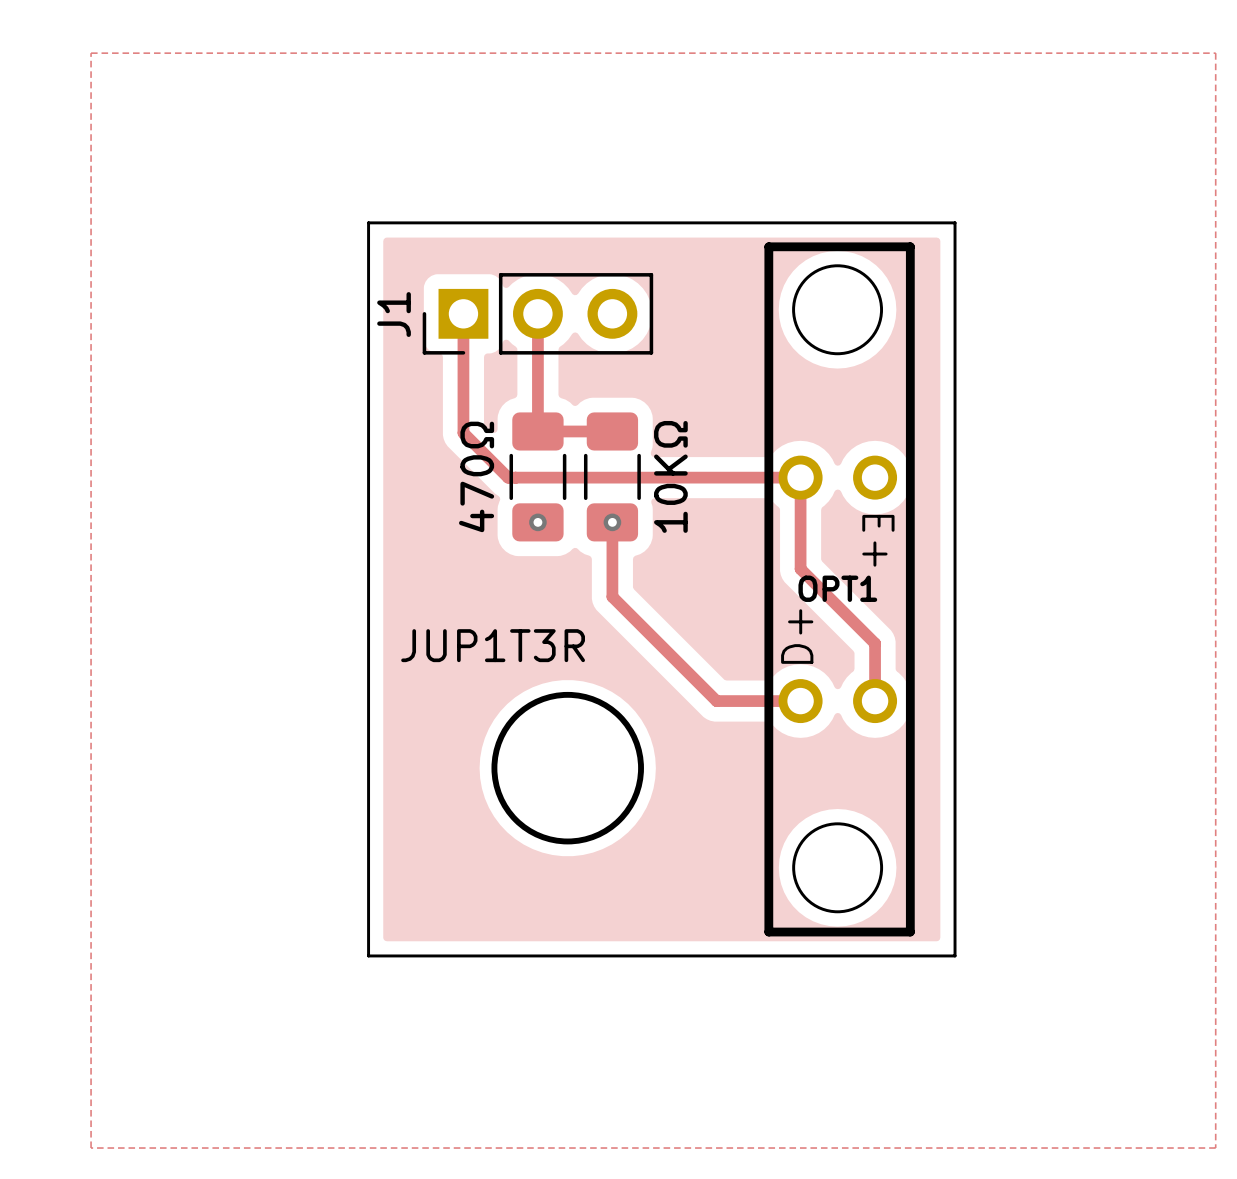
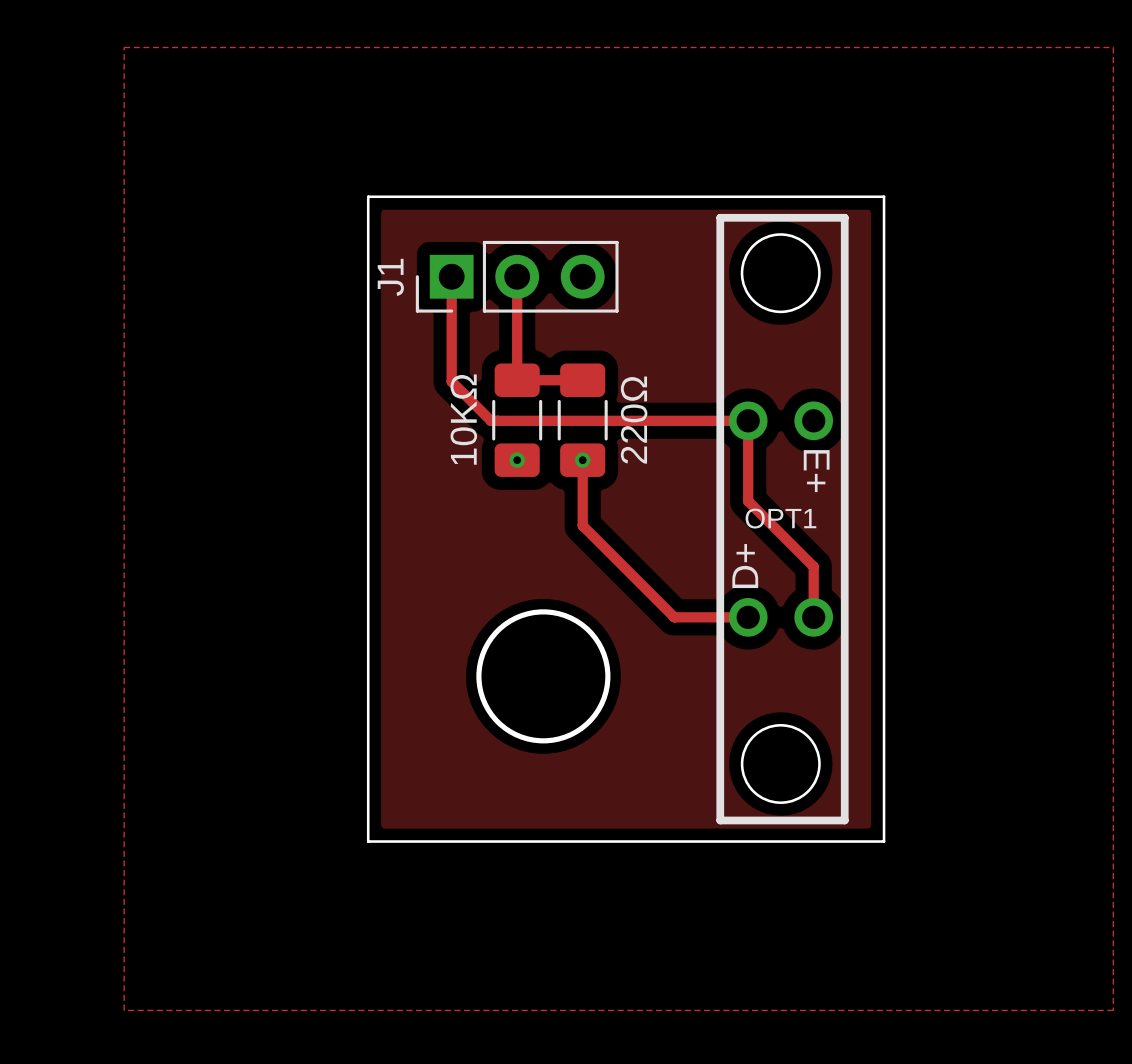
470Ω name: 470Ω (476, 476) -> 10KΩ (463, 419)
10KΩ name: 10KΩ (670, 476) -> 220Ω (634, 420)
text: JUP1T3R (493, 645) -> none

